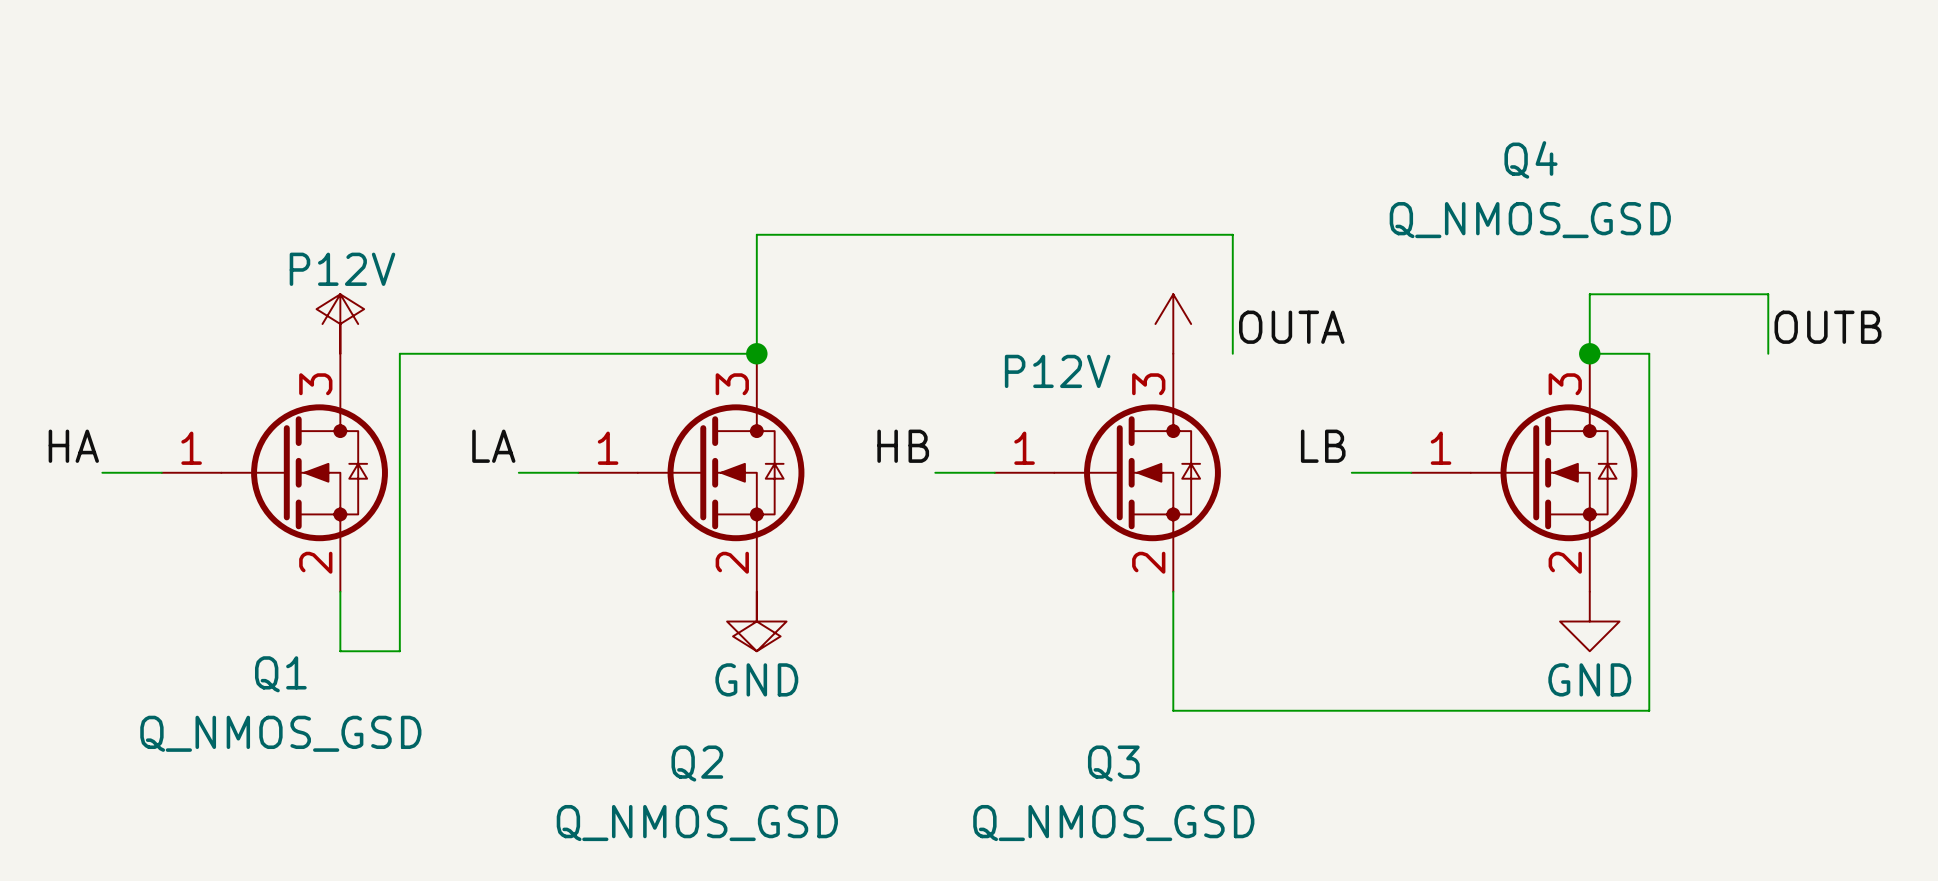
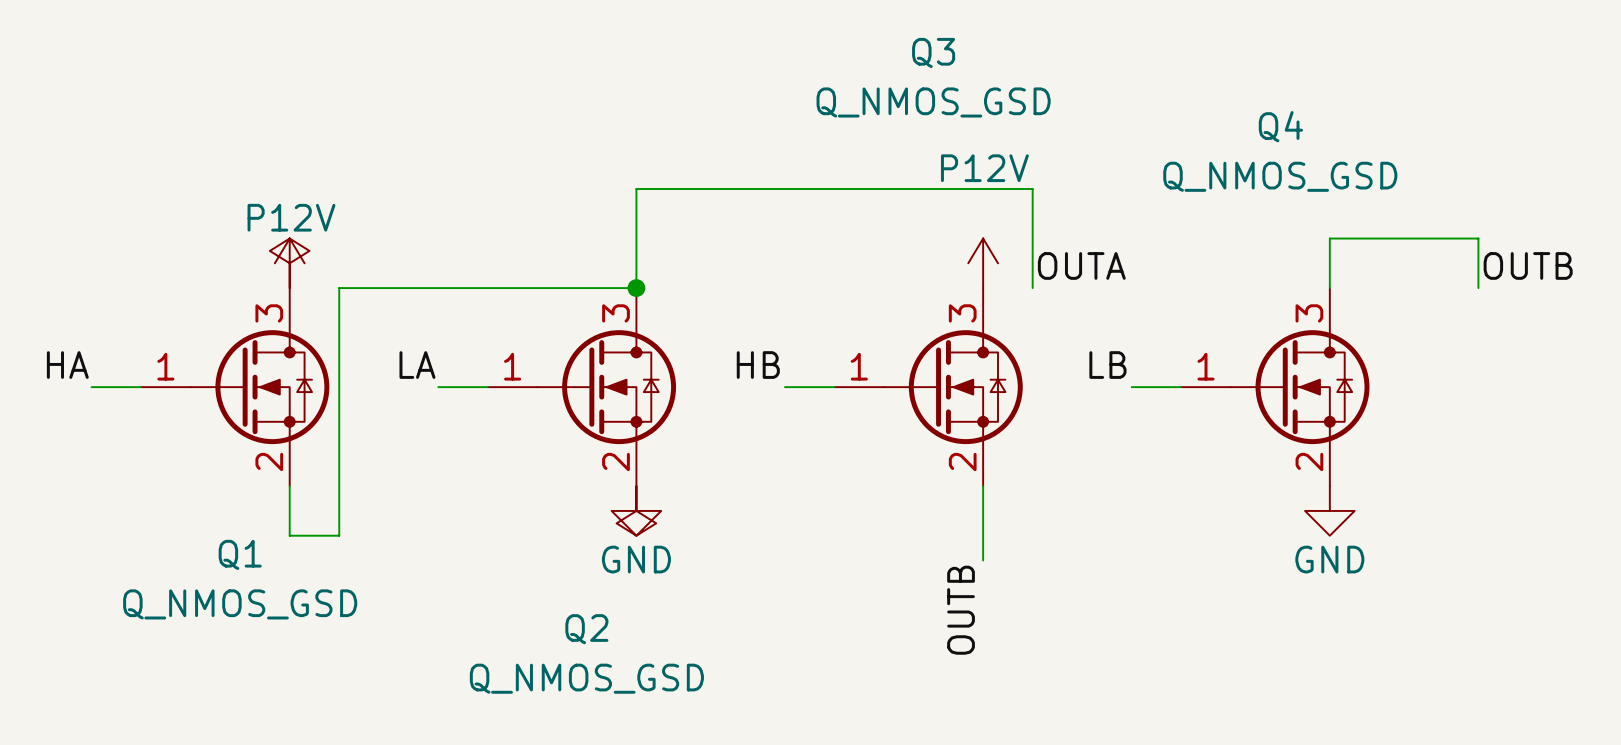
wire: (1589, 353) (1649, 353) (1649, 710) (1173, 710) (1173, 681) -> none
junction: (1589, 353) -> none
power symbol text position: P12V (1057, 371) -> P12V (984, 168)
label: none -> OUTB (961, 610)
Q3 name position: Q3 (1113, 763) -> Q3 (933, 52)
Q3 value position: Q_NMOS_GSD (1113, 823) -> Q_NMOS_GSD (933, 102)

